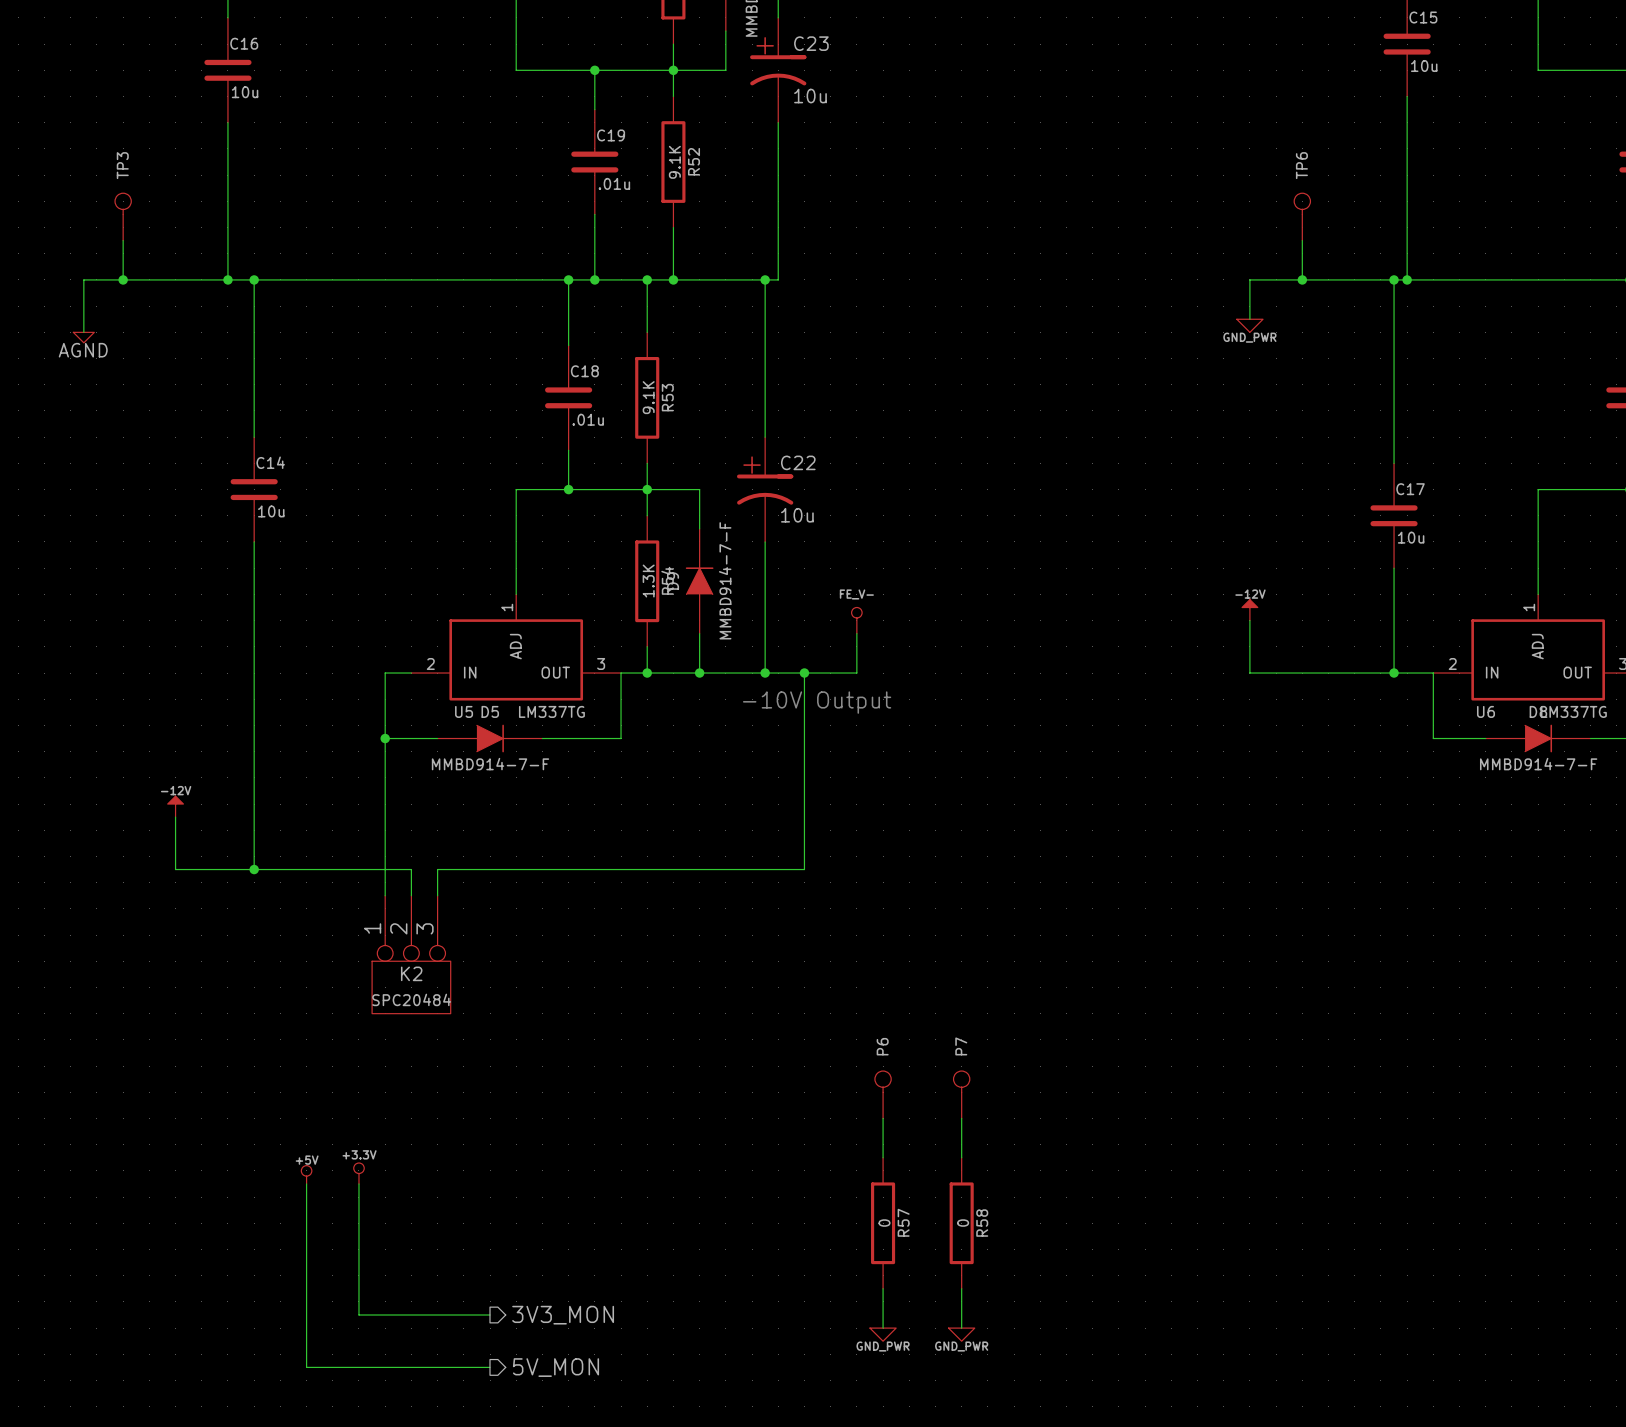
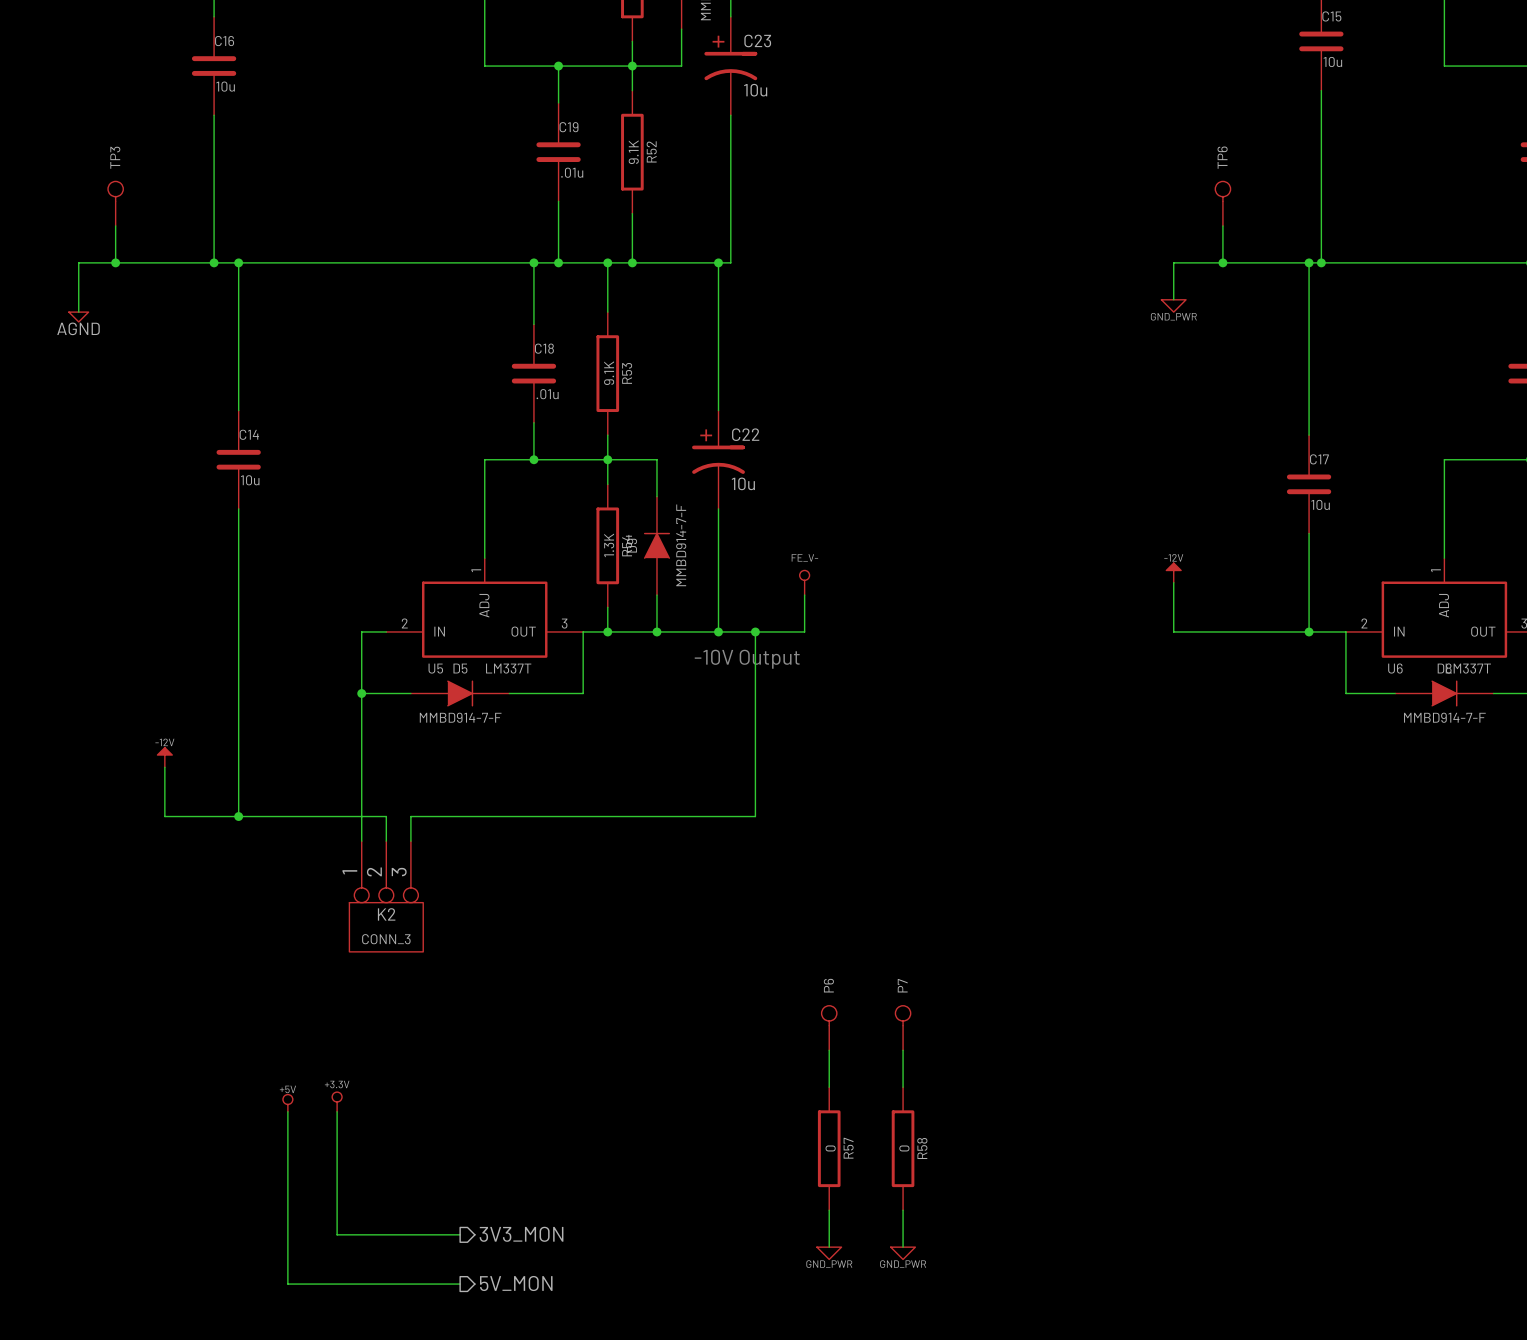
U5 value: LM337TG (551, 711) -> LM337T (508, 668)
U6 value: LM337TG (1573, 711) -> LM337T (1468, 668)
K2 value: SPC20484 (411, 999) -> CONN_3 (386, 939)

